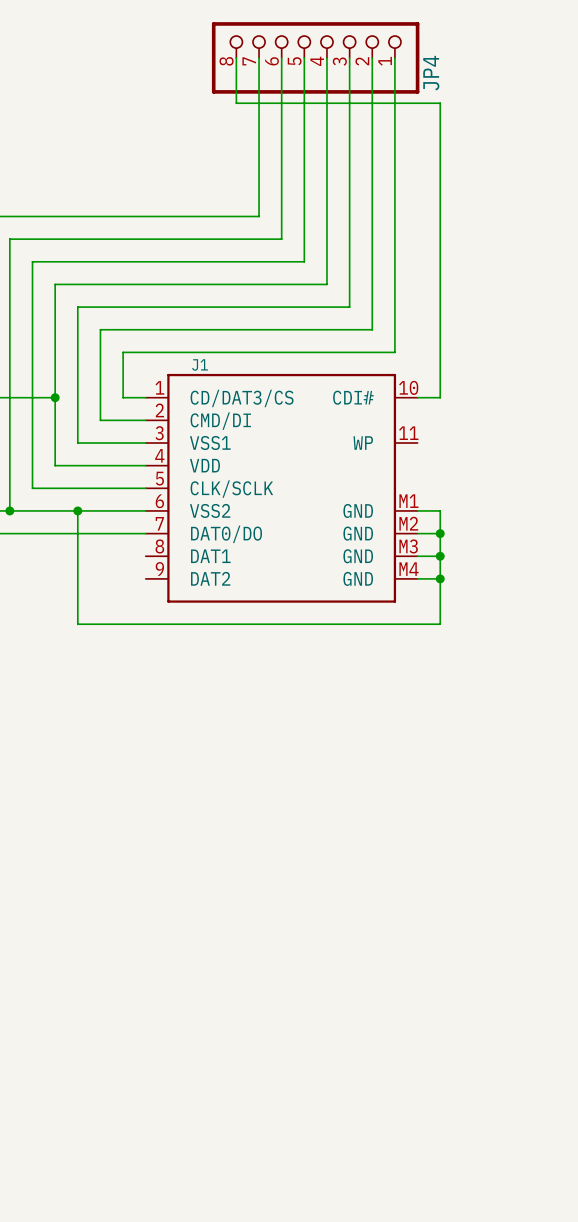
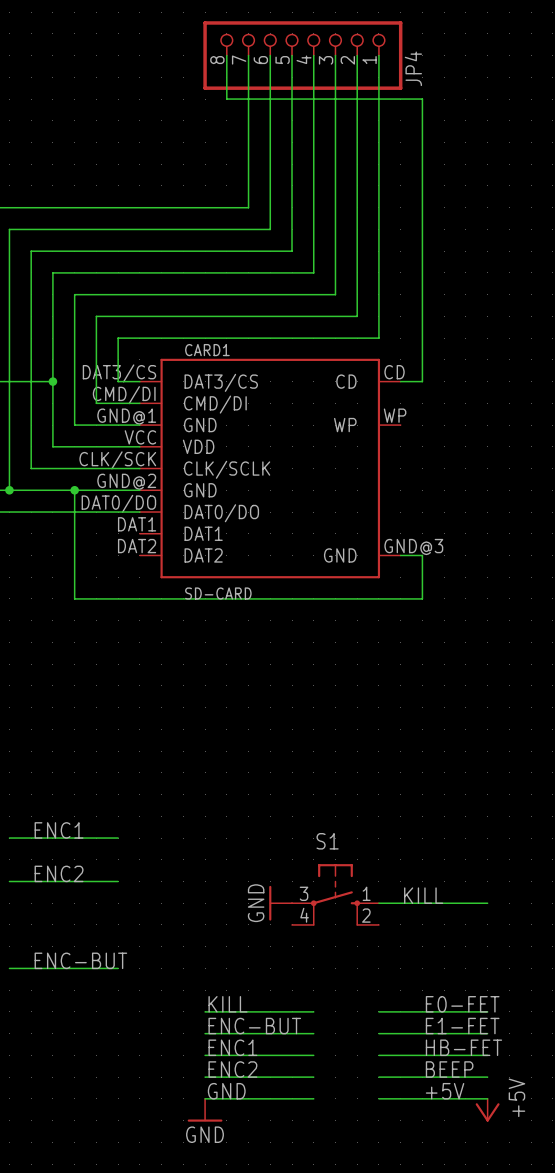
J1: (281, 488) -> none
CARD1: none -> SD-CARD (270, 468)
wire: (417, 510) (440, 510) (440, 578) -> none
wire: (417, 533) (440, 533) -> none
junction: (440, 533) -> none
wire: (417, 556) (440, 556) -> none
junction: (440, 556) -> none
junction: (440, 578) -> none
label: none -> ENC1 (59, 830)
wire: none -> (9, 838) (118, 838)
label: none -> ENC2 (59, 873)
wire: none -> (9, 881) (118, 881)
S1: none -> (335, 894)
label: none -> KILL (423, 895)
power symbol: none -> GND (280, 903)
wire: none -> (378, 903) (487, 903)
label: none -> ENC-BUT (80, 960)
wire: none -> (9, 968) (118, 968)
label: none -> KILL (228, 1004)
label: none -> E0-FET (462, 1004)
wire: none -> (205, 1011) (313, 1011)
wire: none -> (378, 1011) (487, 1011)
label: none -> ENC-BUT (254, 1026)
label: none -> E1-FET (462, 1026)
wire: none -> (205, 1033) (313, 1033)
wire: none -> (378, 1033) (487, 1033)
label: none -> ENC1 (232, 1047)
label: none -> HB-FET (463, 1047)
wire: none -> (205, 1055) (313, 1055)
wire: none -> (378, 1055) (487, 1055)
label: none -> ENC2 (232, 1069)
label: none -> BEEP (449, 1069)
wire: none -> (205, 1077) (313, 1077)
wire: none -> (378, 1077) (487, 1077)
label: none -> GND (226, 1091)
label: none -> +5V (445, 1091)
wire: none -> (205, 1098) (313, 1098)
wire: none -> (378, 1098) (487, 1098)
power symbol: none -> GND (205, 1110)
power symbol: none -> +5V (487, 1110)

